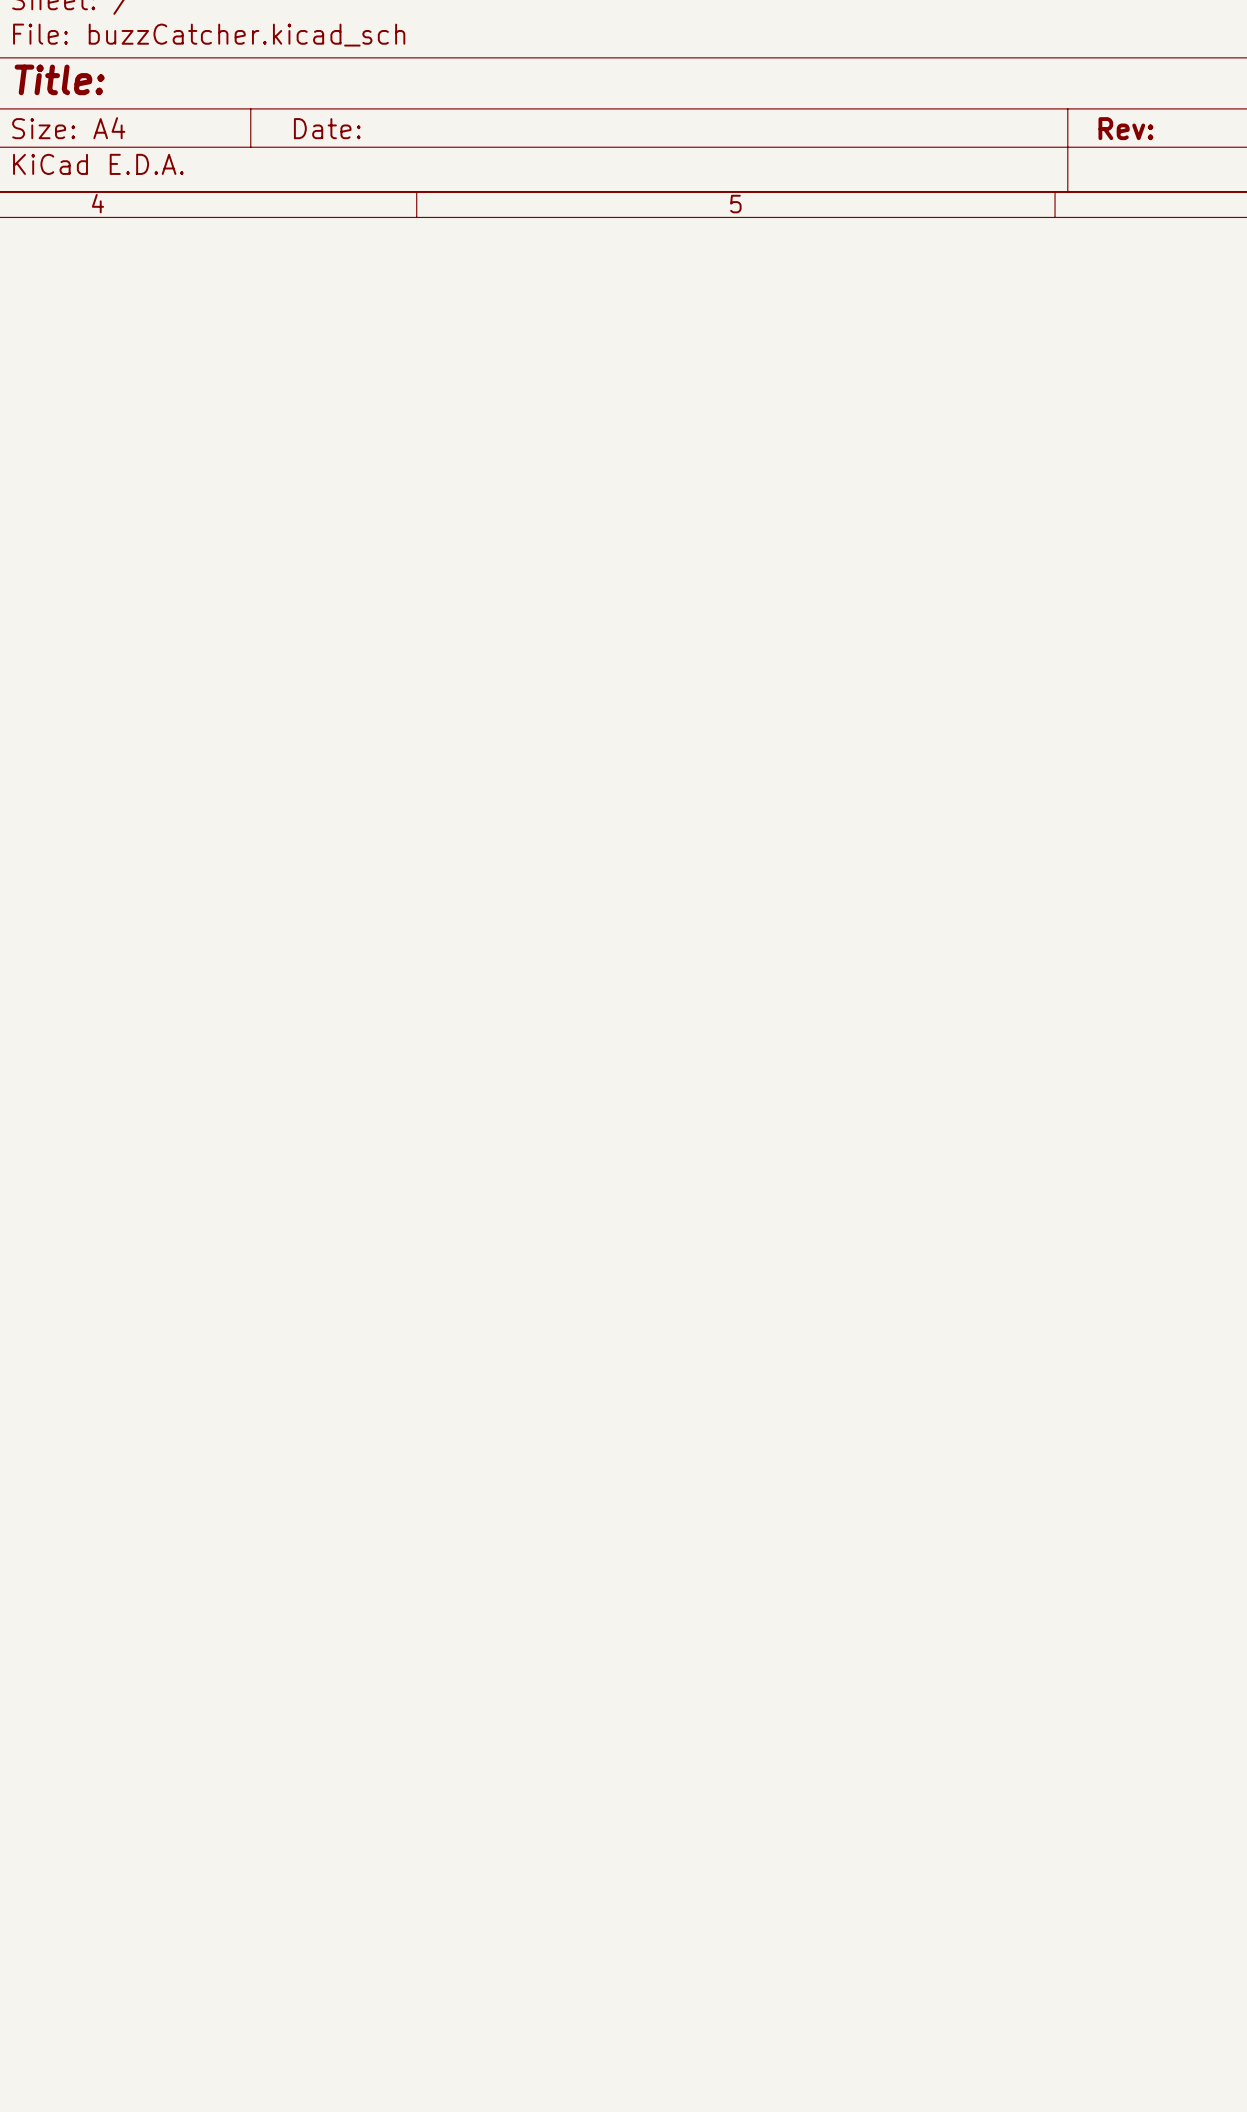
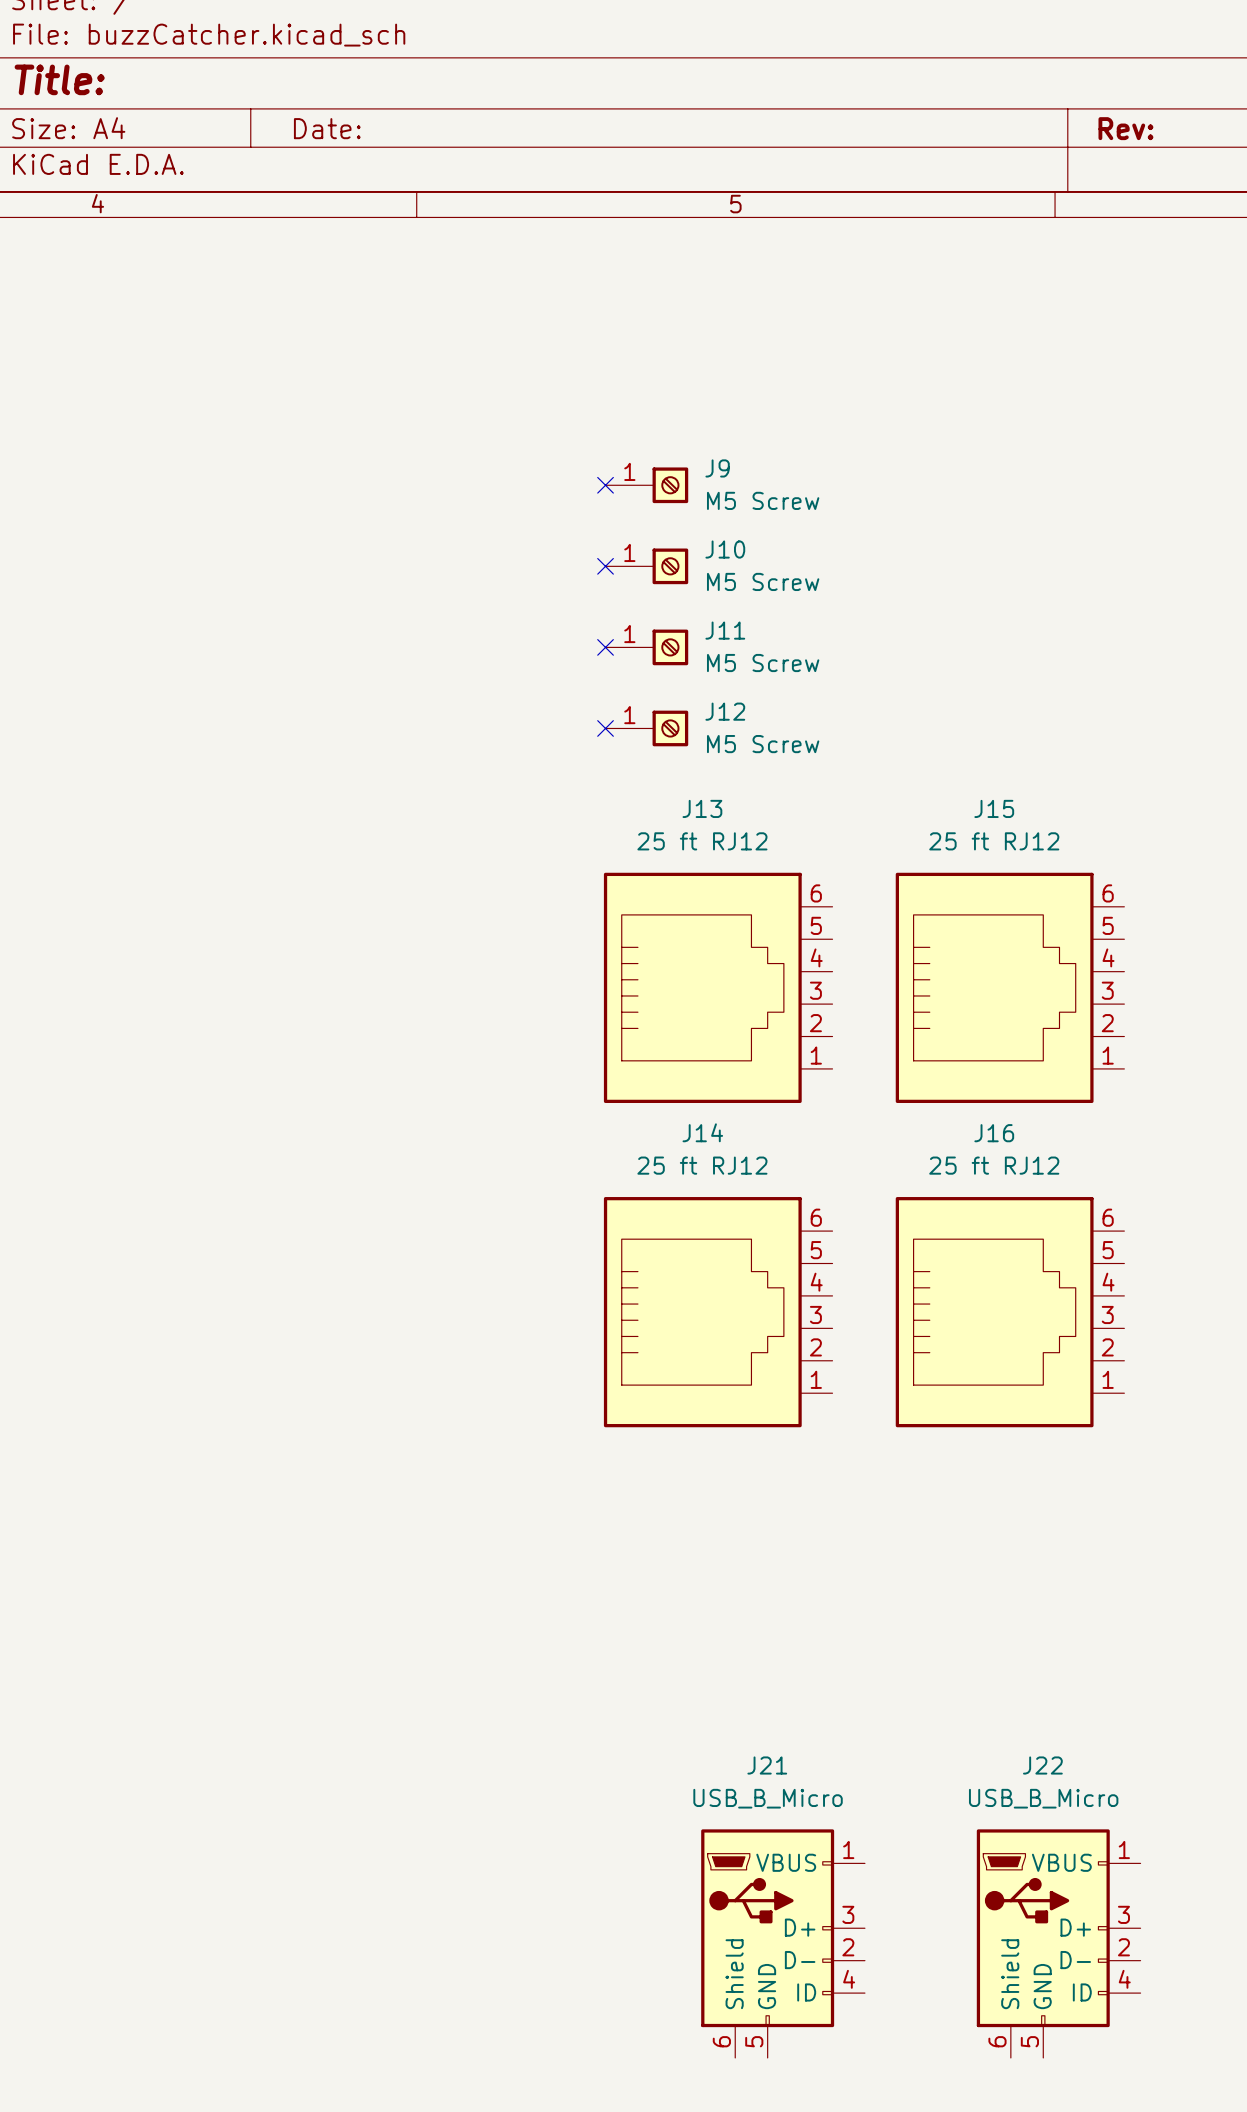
no-connect mark: none -> (605, 485)
J9: none -> M5 Screw (646, 485)
no-connect mark: none -> (605, 566)
J10: none -> M5 Screw (646, 566)
no-connect mark: none -> (605, 647)
J11: none -> M5 Screw (646, 647)
no-connect mark: none -> (605, 728)
J12: none -> M5 Screw (646, 728)
J13: none -> 25 ft RJ12 (718, 987)
J15: none -> 25 ft RJ12 (1010, 987)
J14: none -> 25 ft RJ12 (718, 1312)
J16: none -> 25 ft RJ12 (1010, 1312)
J21: none -> USB_B_Micro (783, 1943)
J22: none -> USB_B_Micro (1058, 1943)

